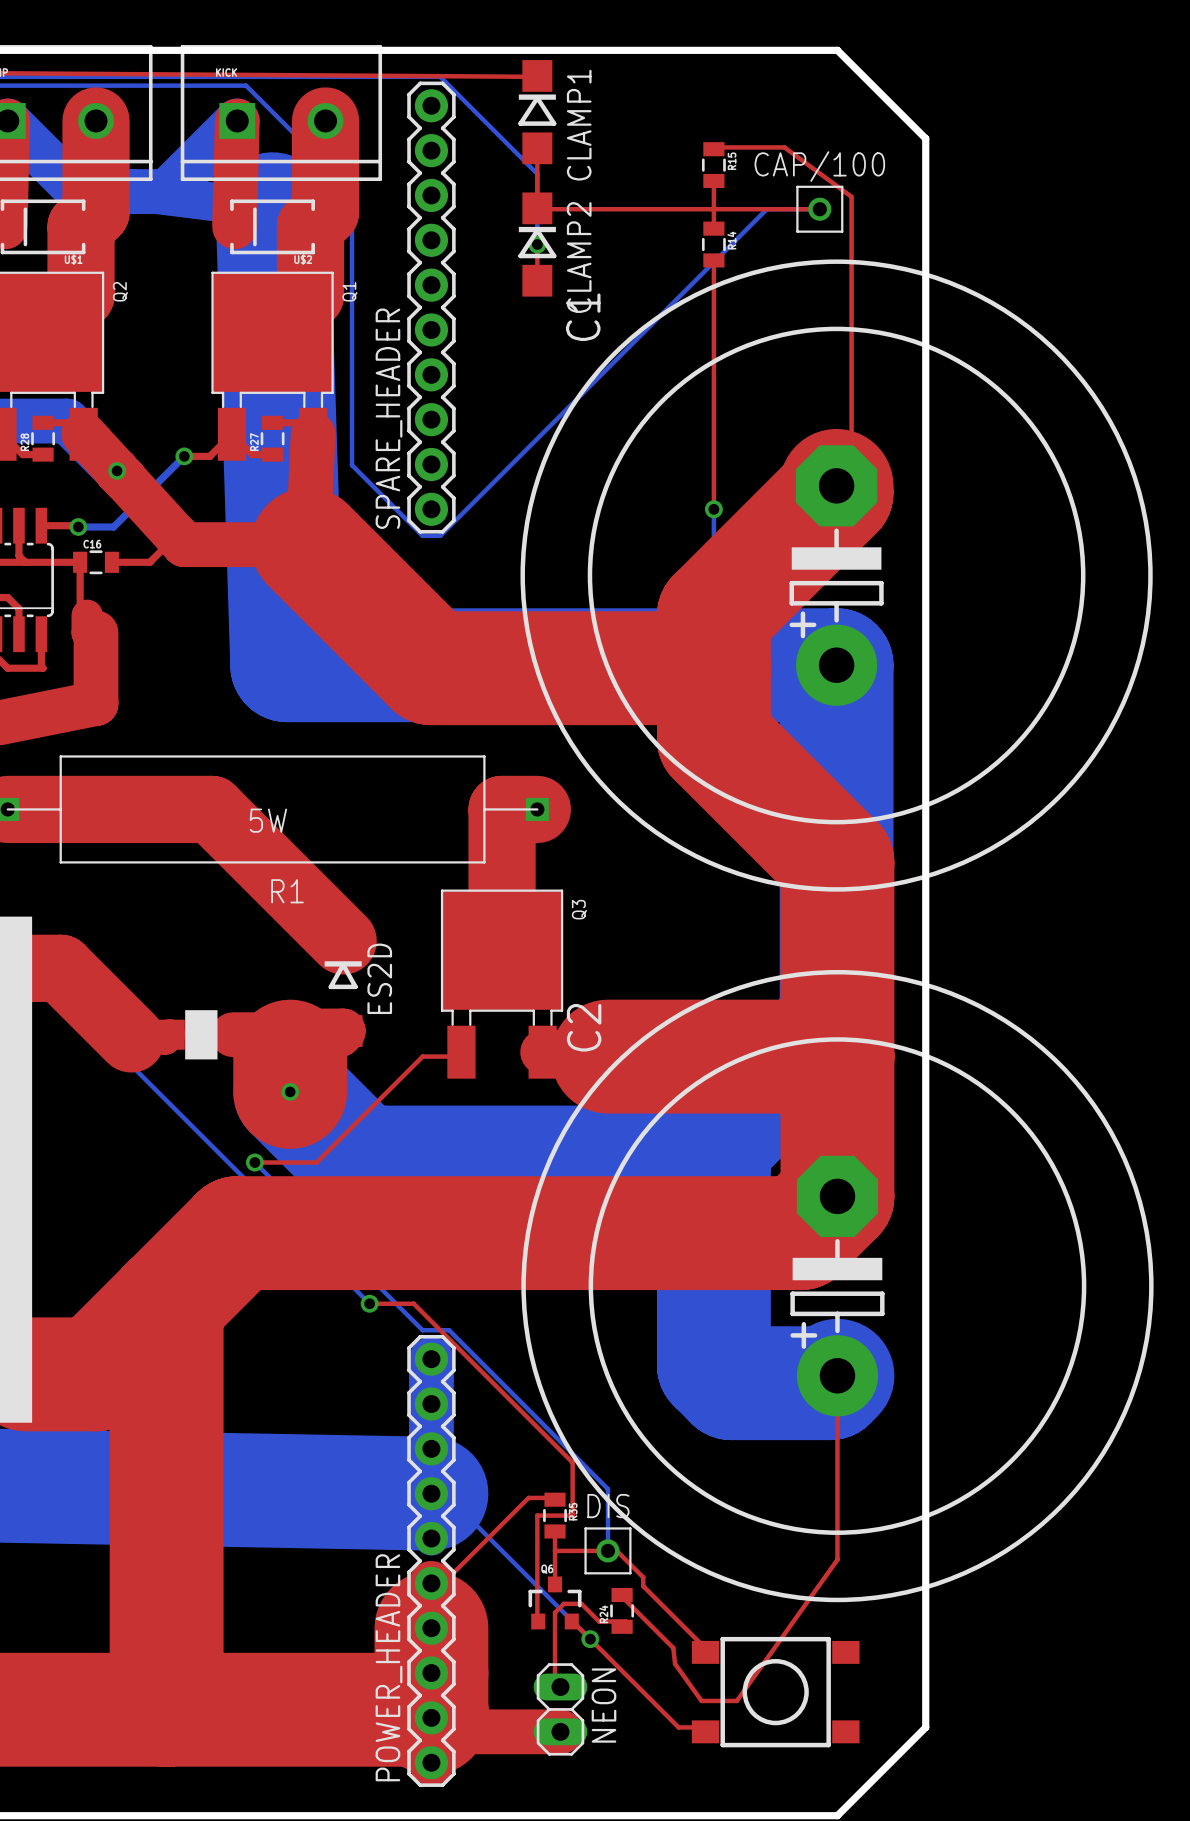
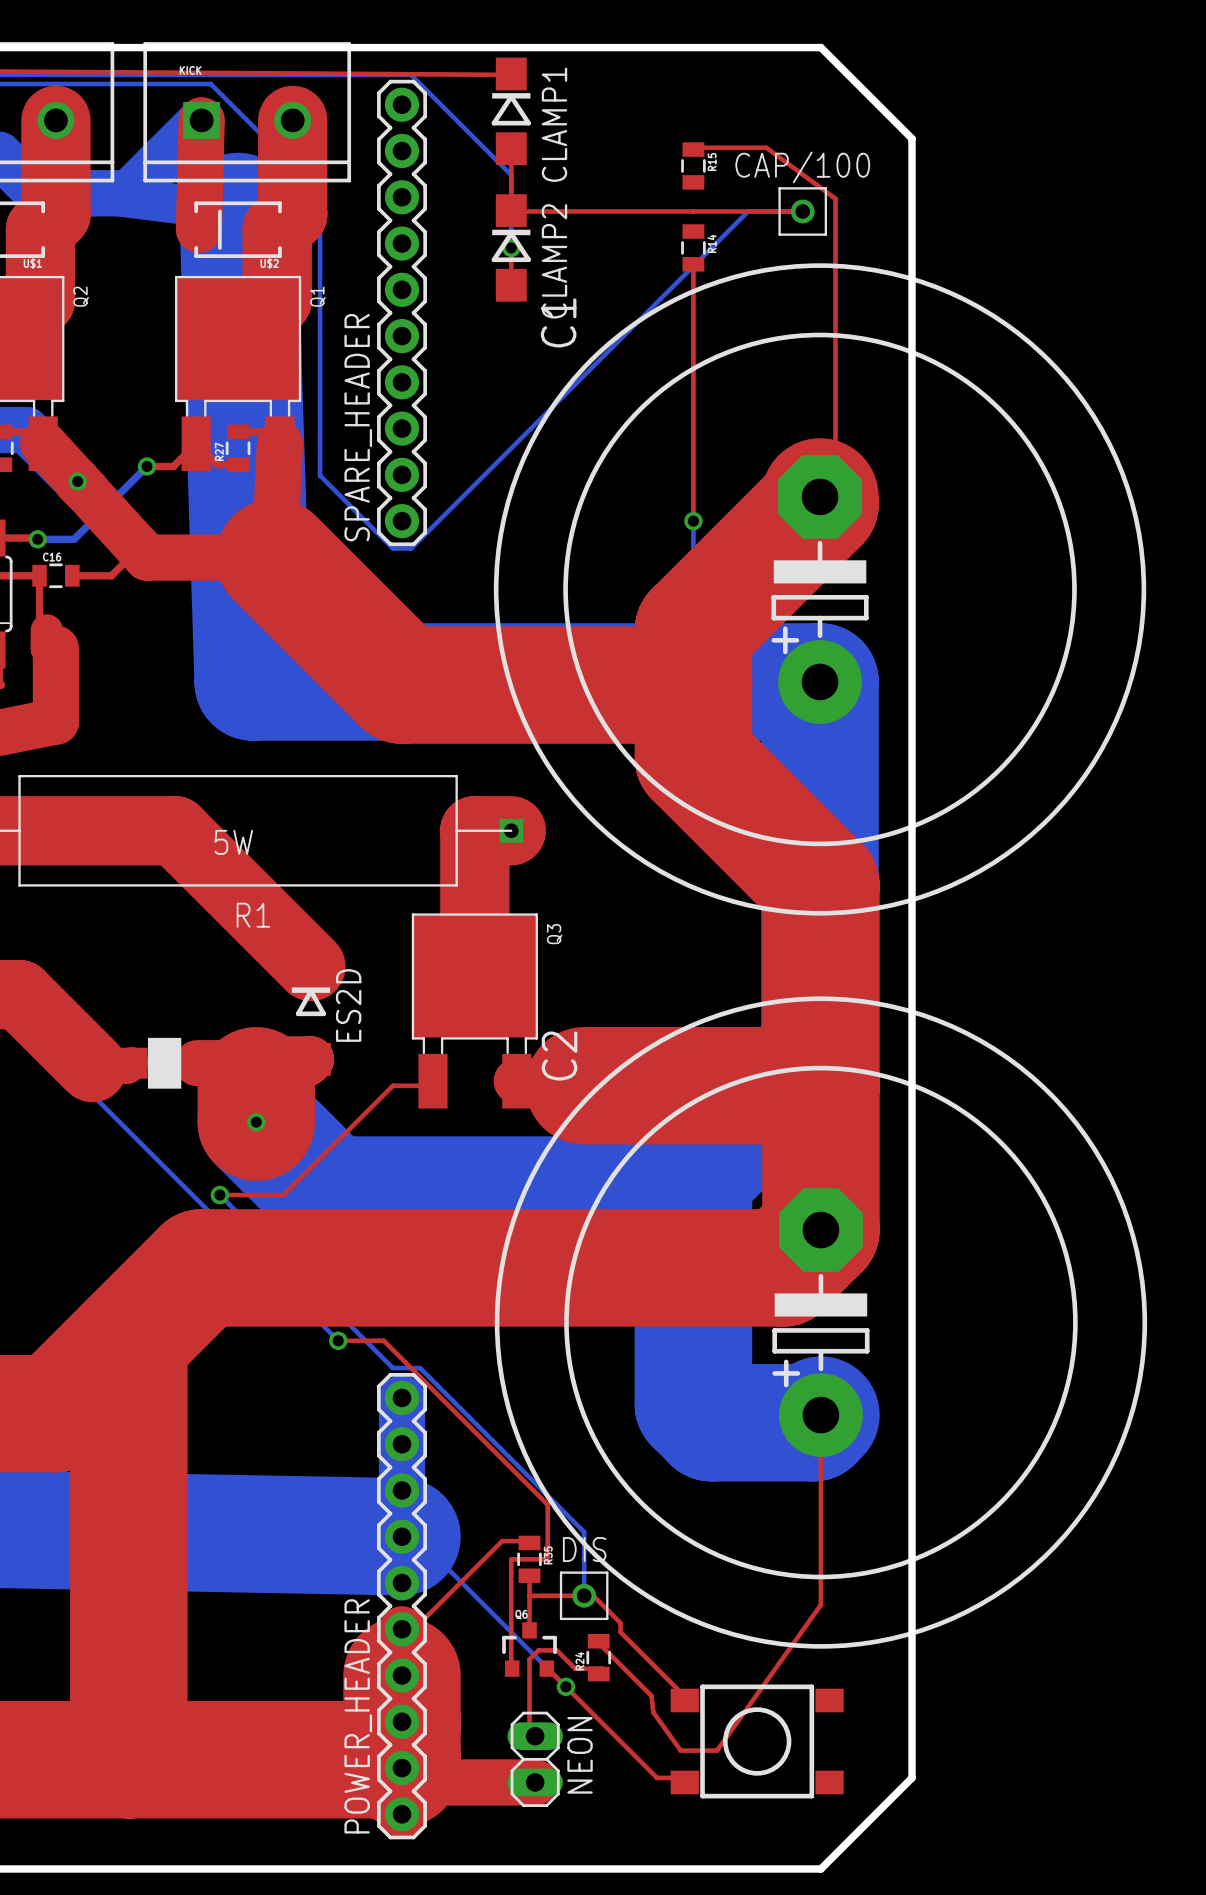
top track: (713, 180) (713, 228) -> none

